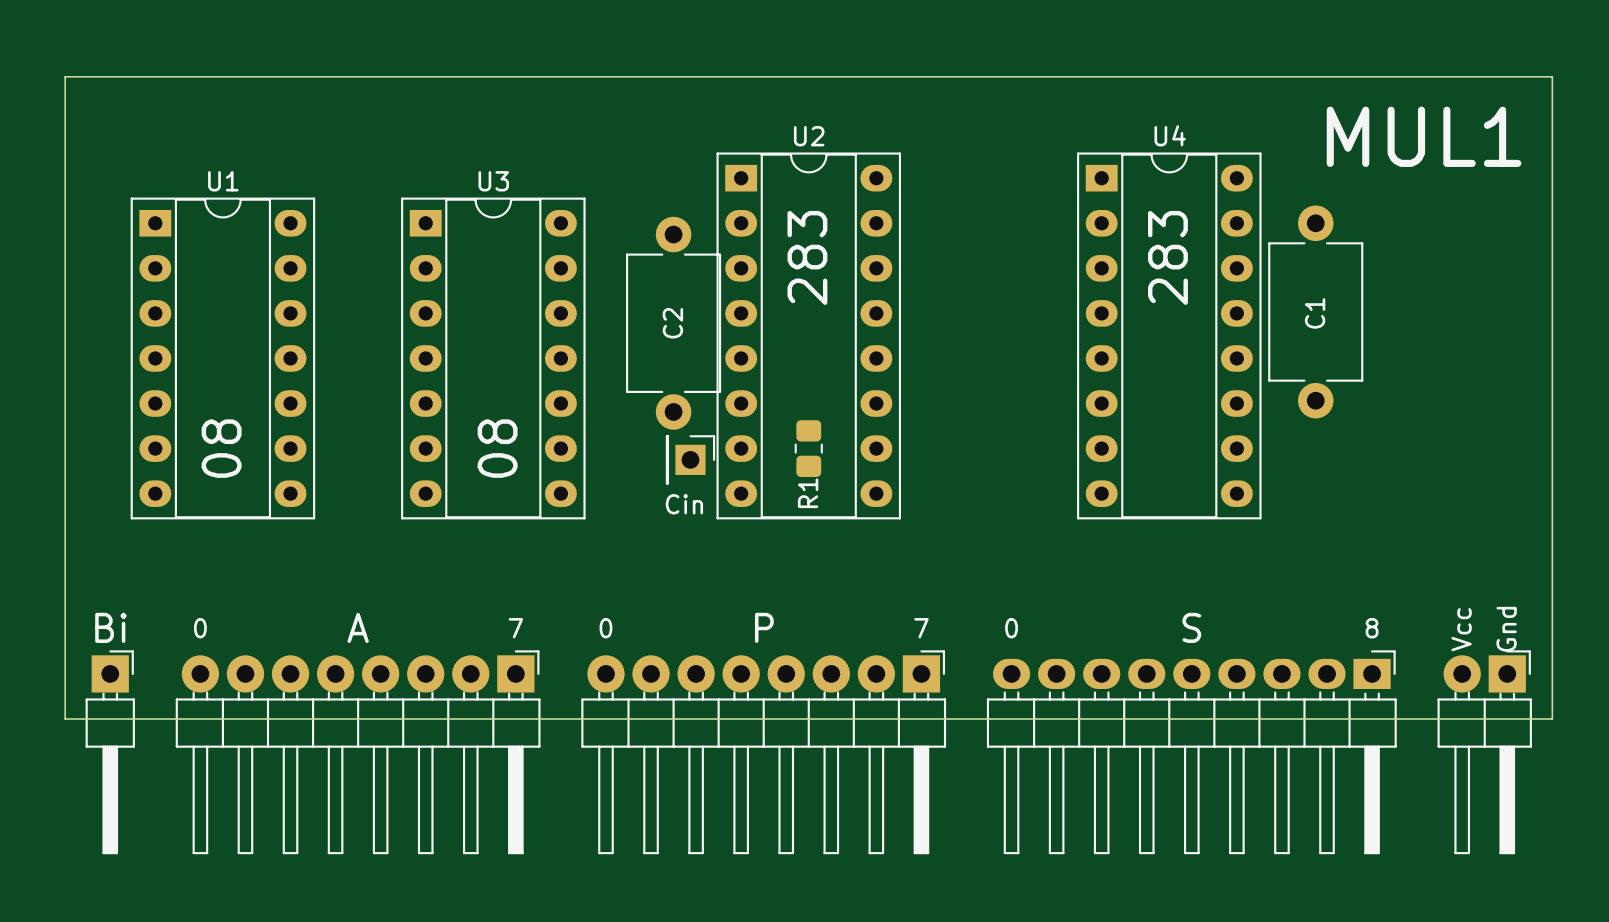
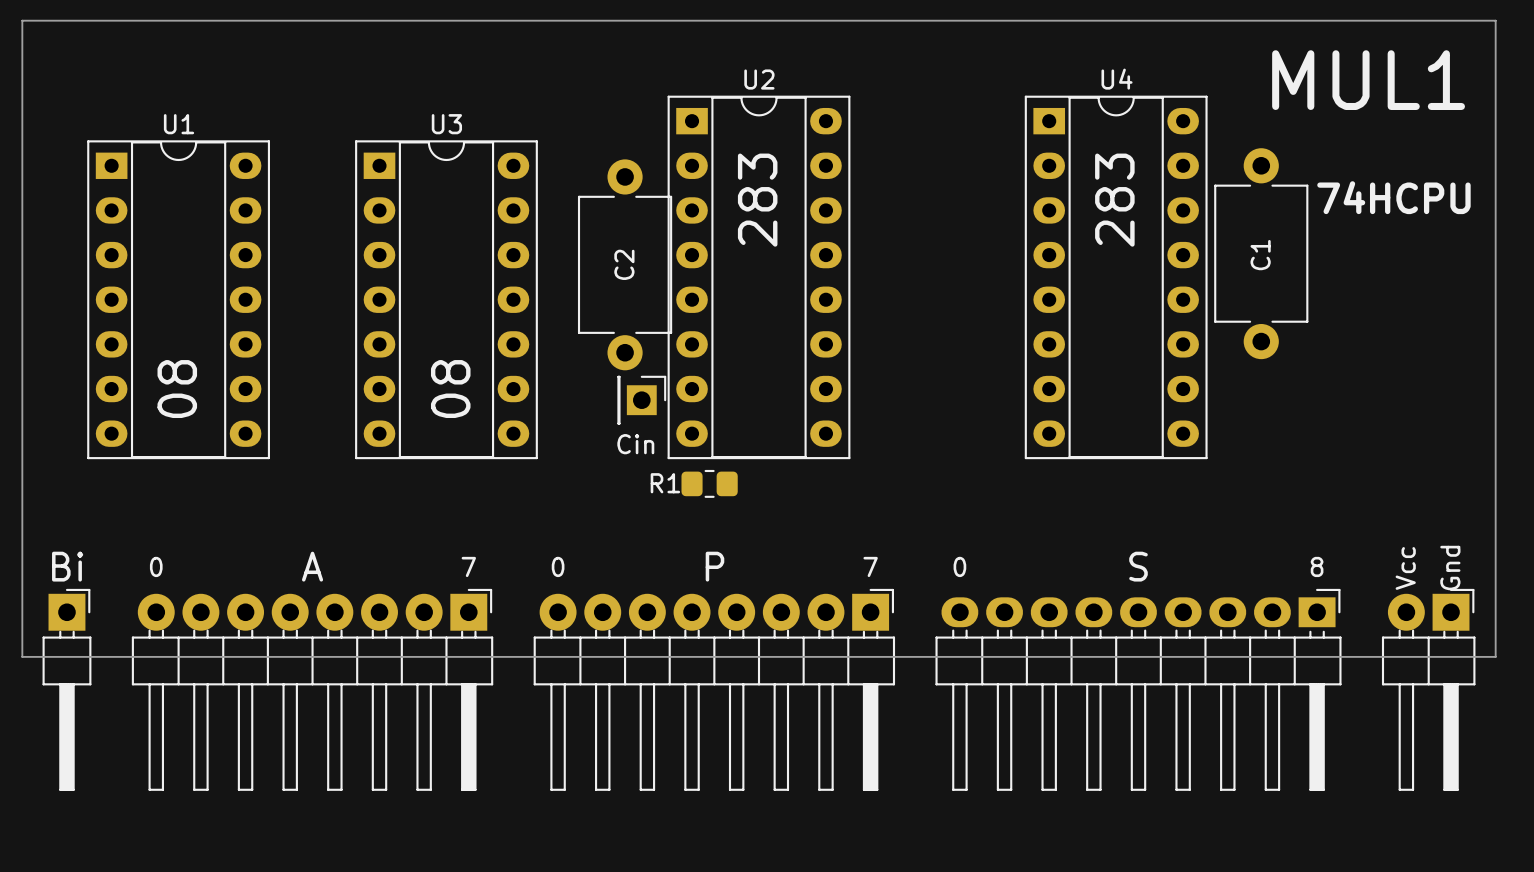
text: none -> 74HCPU (1393, 197)
R1 rotation: 0° (808, 448) -> 90° clockwise (709, 483)
R1 position: (808, 448) -> (709, 483)

